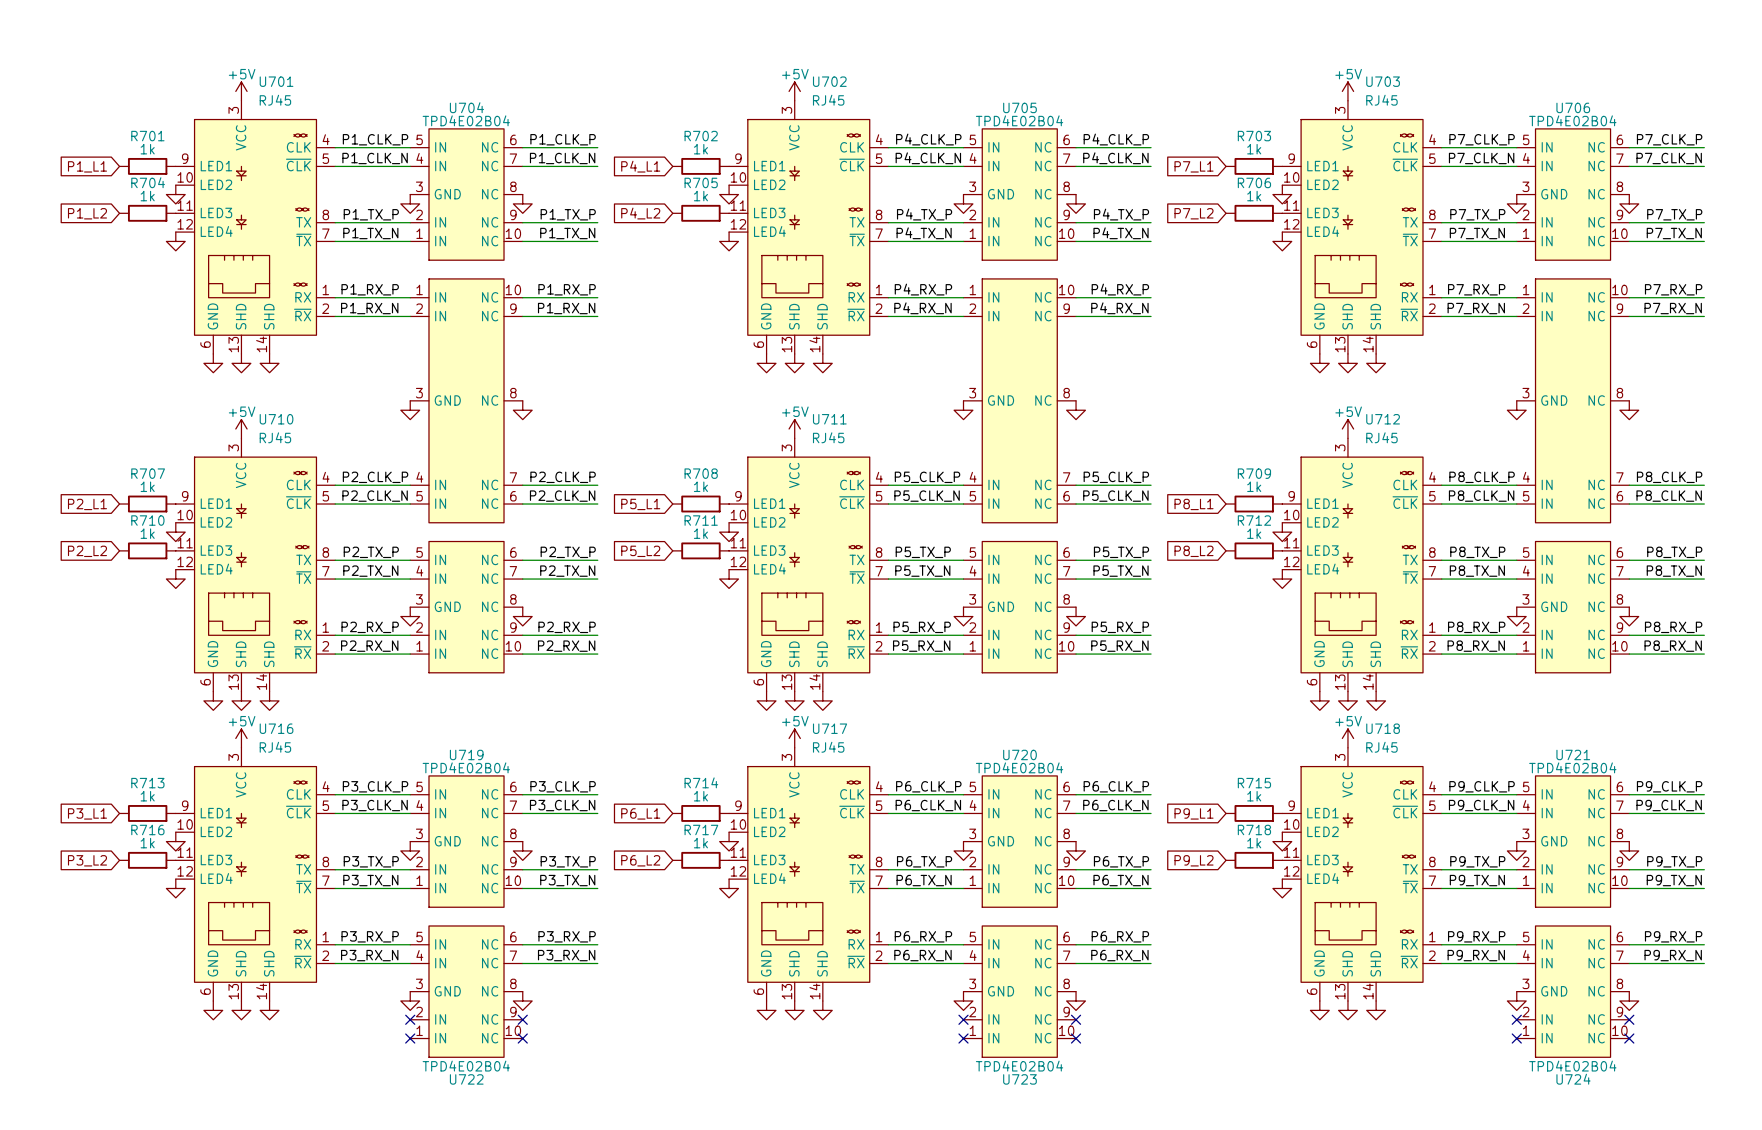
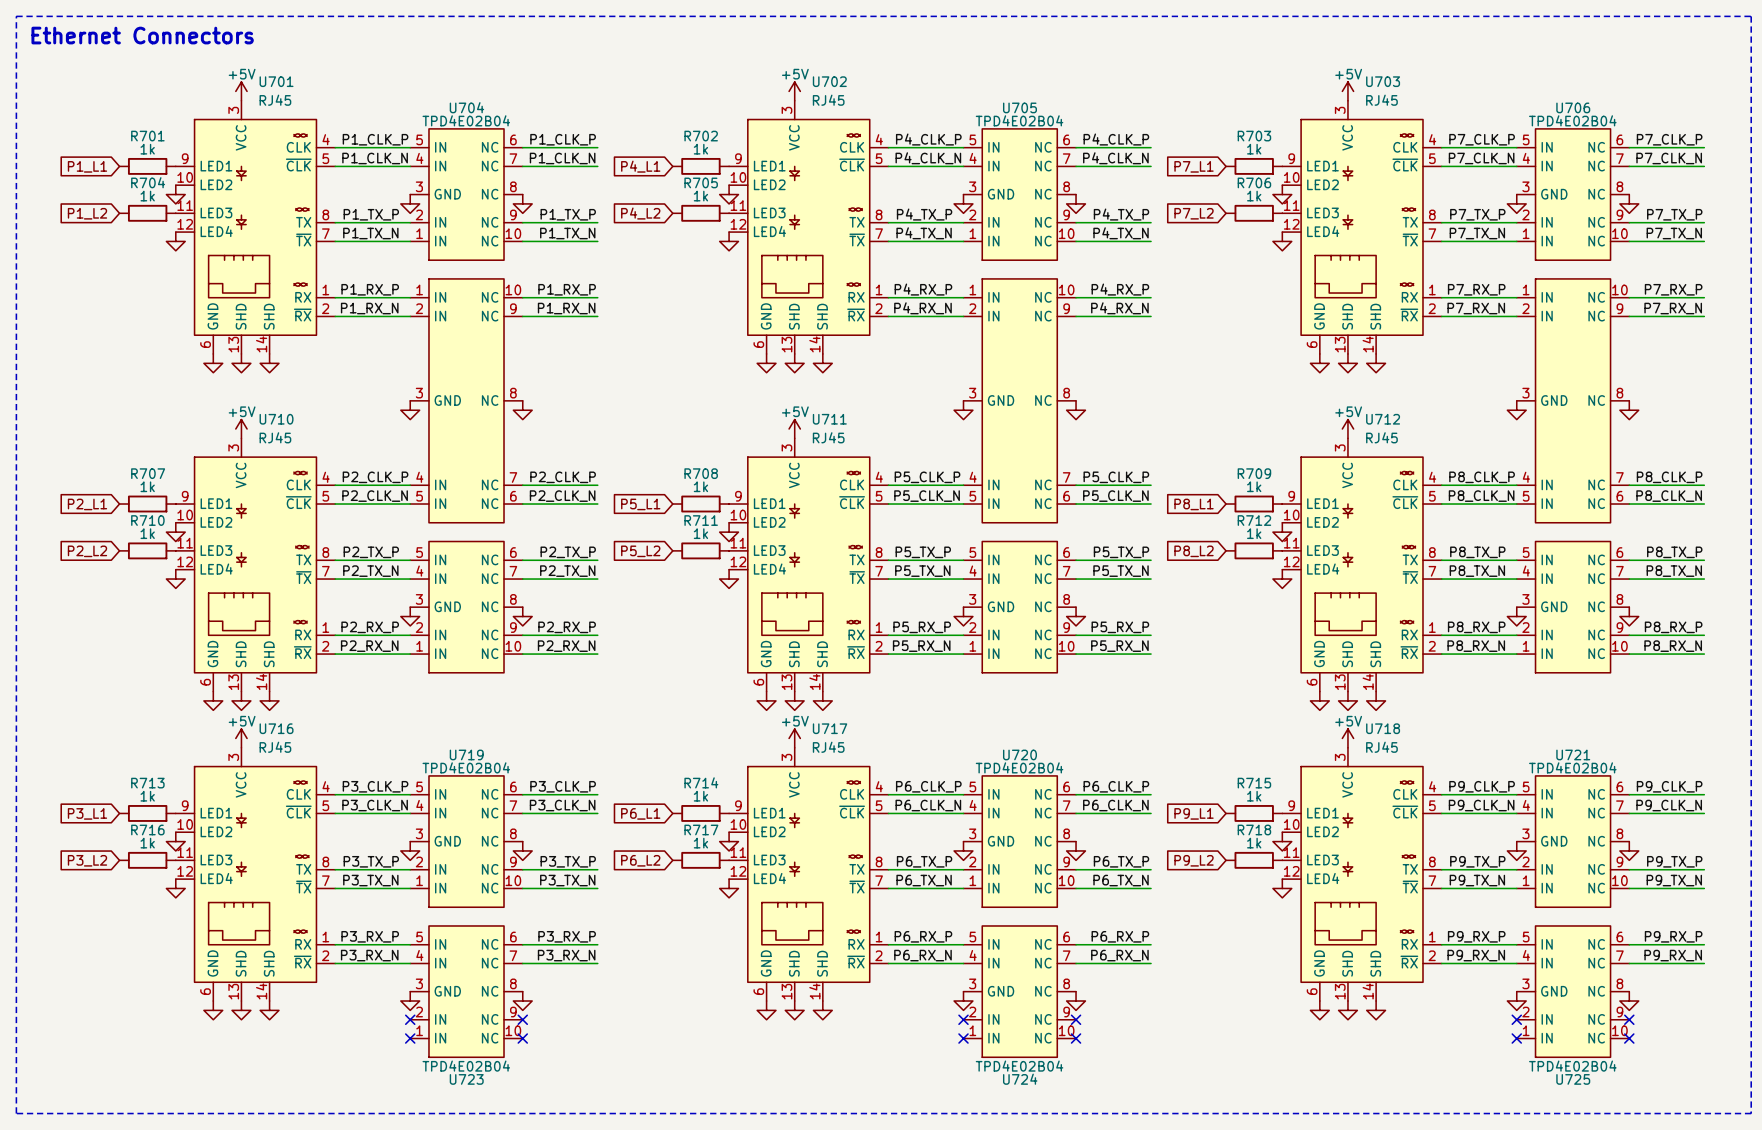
line: none -> (16, 16) (1751, 16) (1751, 1113) (16, 1113) (16, 16)
text: none -> Ethernet Connectors (142, 35)
U722 name: U722 (466, 1079) -> U723 (466, 1079)
U723 name: U723 (1019, 1079) -> U724 (1020, 1079)
U724 name: U724 (1573, 1079) -> U725 (1573, 1079)

